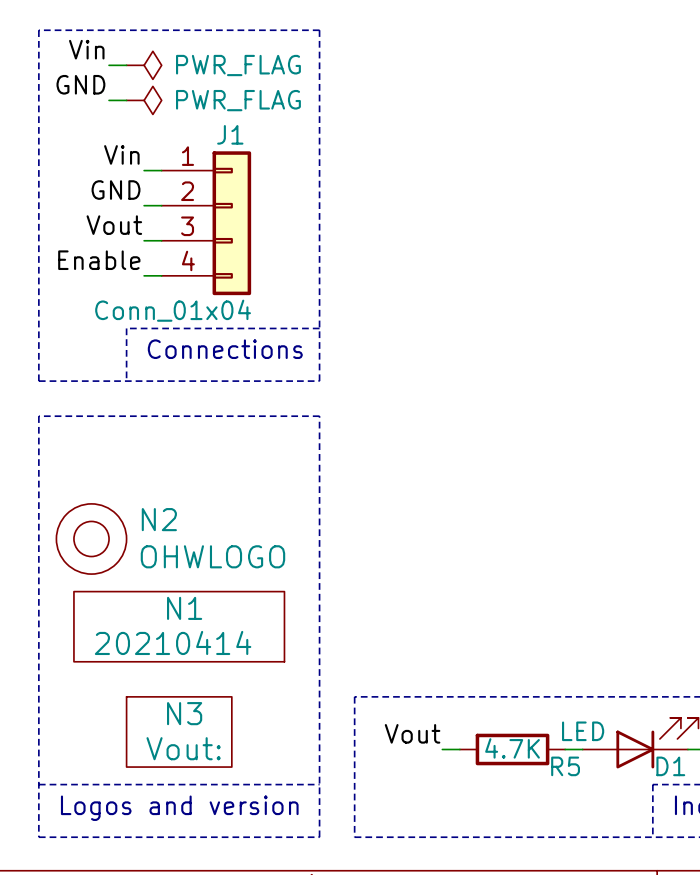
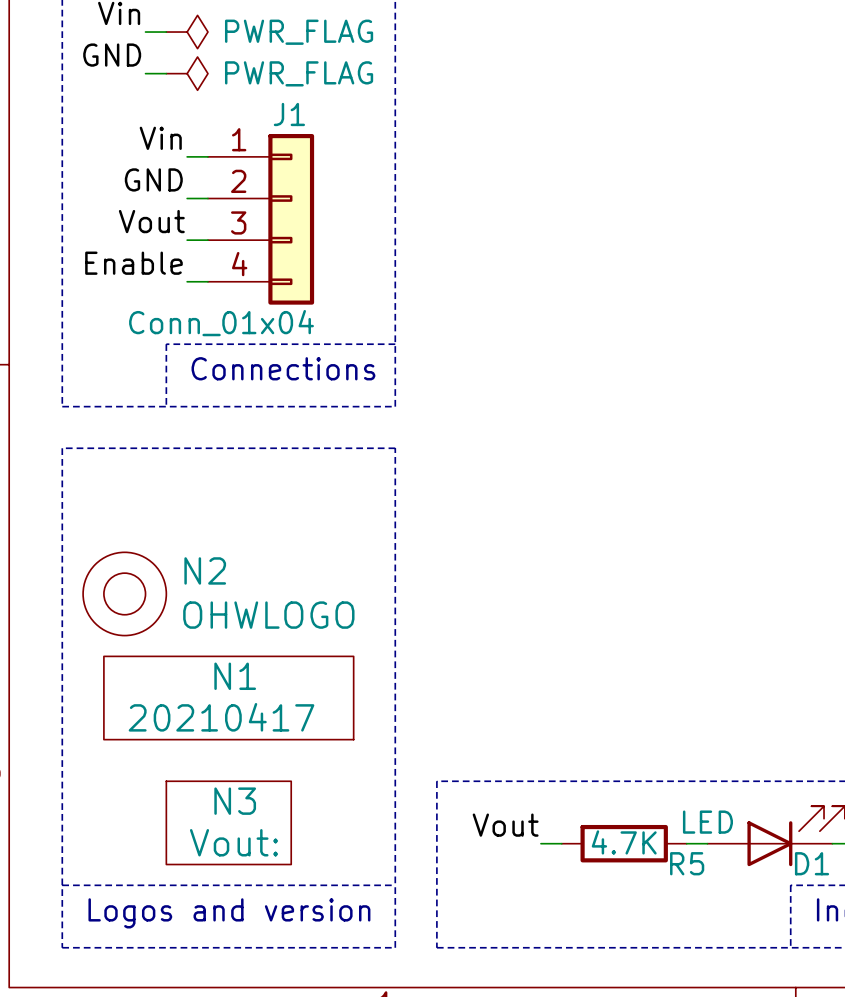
N1 value: 20210414 (173, 642) -> 20210417 (221, 717)

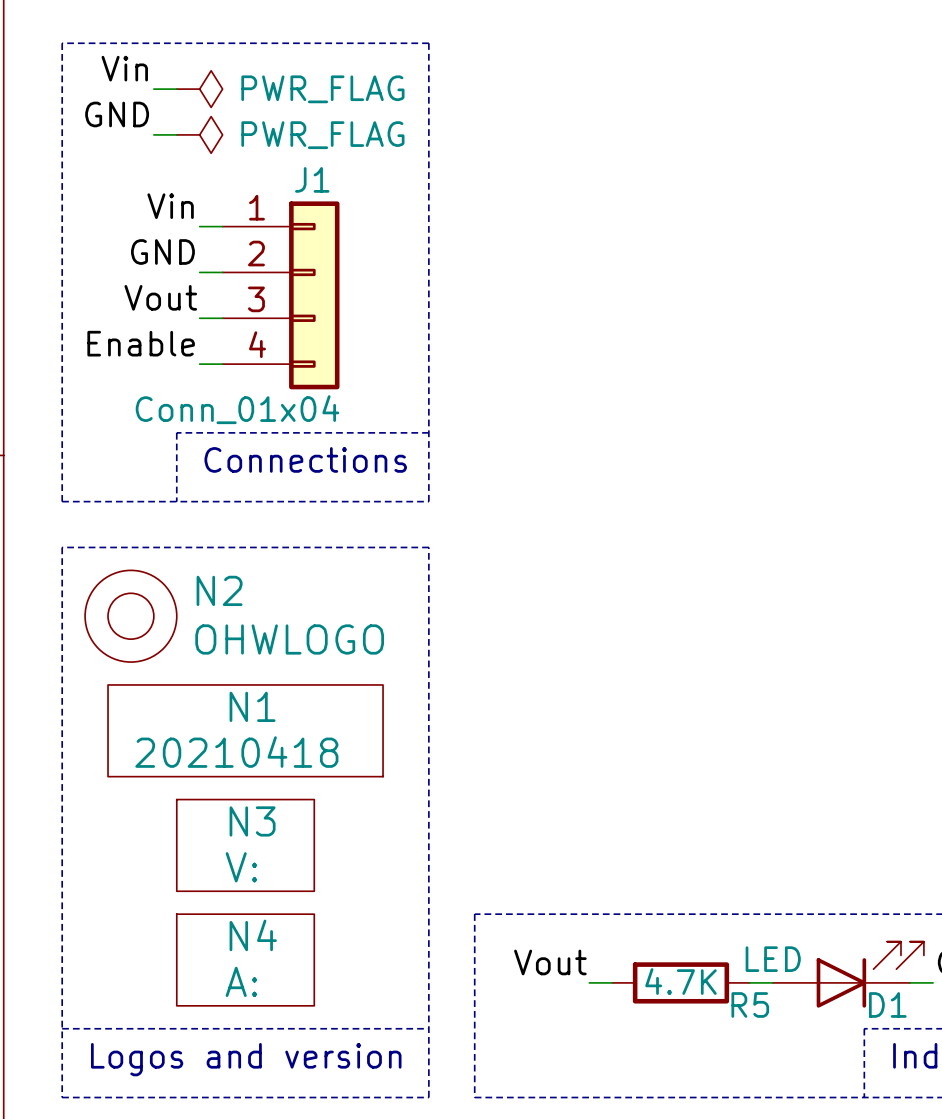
N2 position: (124, 593) -> (130, 616)
N1 position: (228, 698) -> (245, 730)
N1 value: 20210417 (221, 717) -> 20210418 (236, 752)
N3: none -> V: (245, 845)
N3 name: N3 (235, 801) -> N4 (253, 935)
N3 value: Vout: (233, 842) -> A: (241, 981)

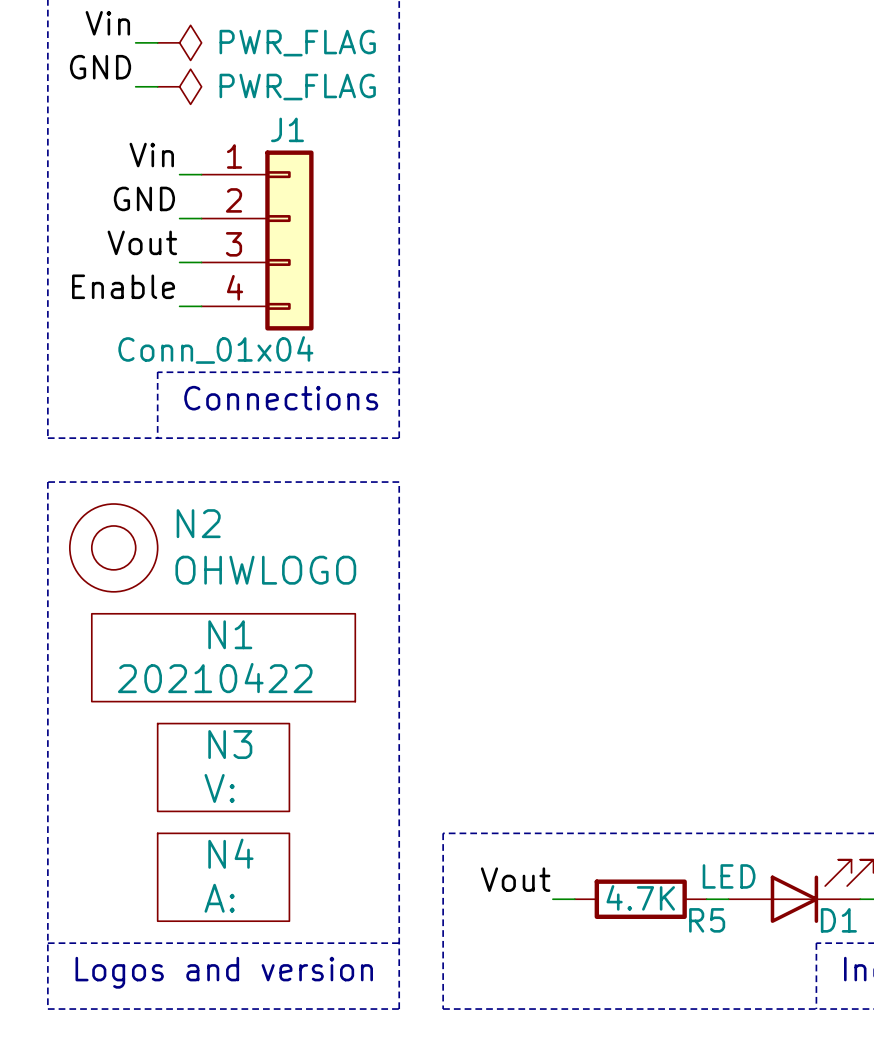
N1 value: 20210418 (236, 752) -> 20210422 (215, 678)

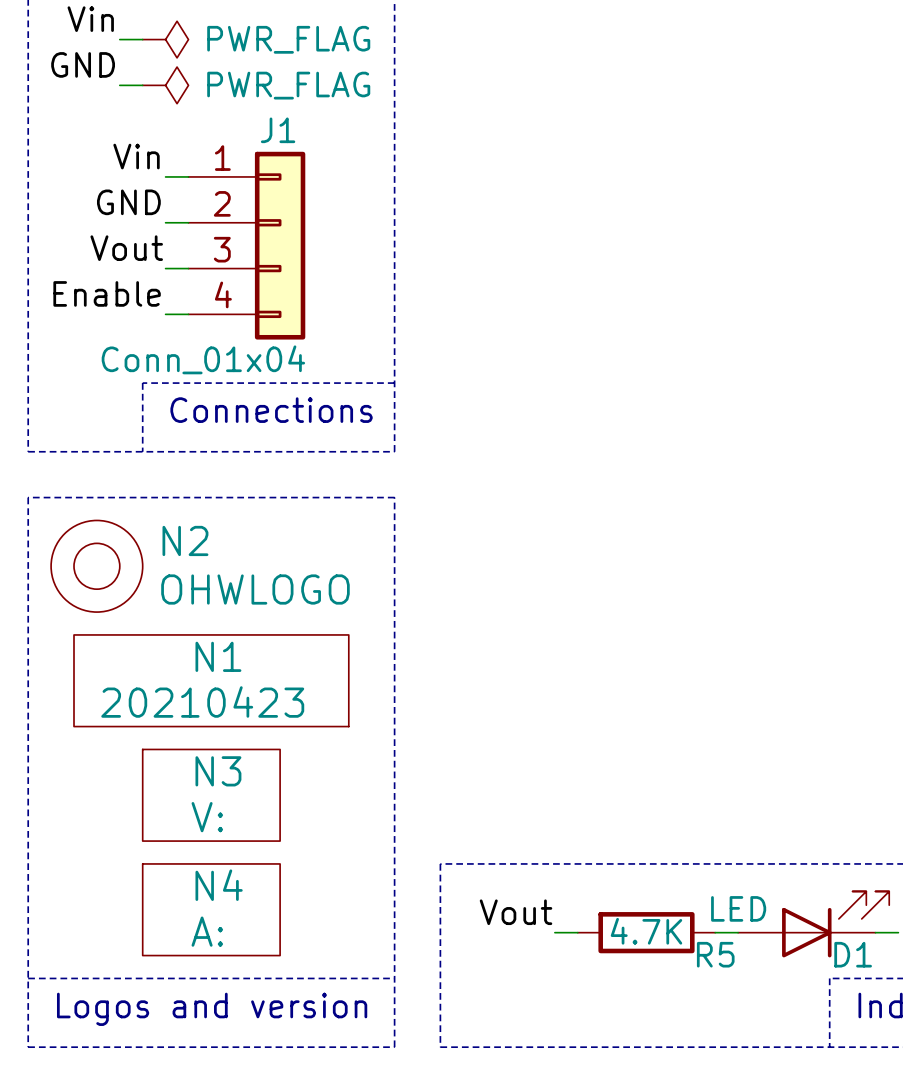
N1 value: 20210422 (215, 678) -> 20210423 (202, 701)

